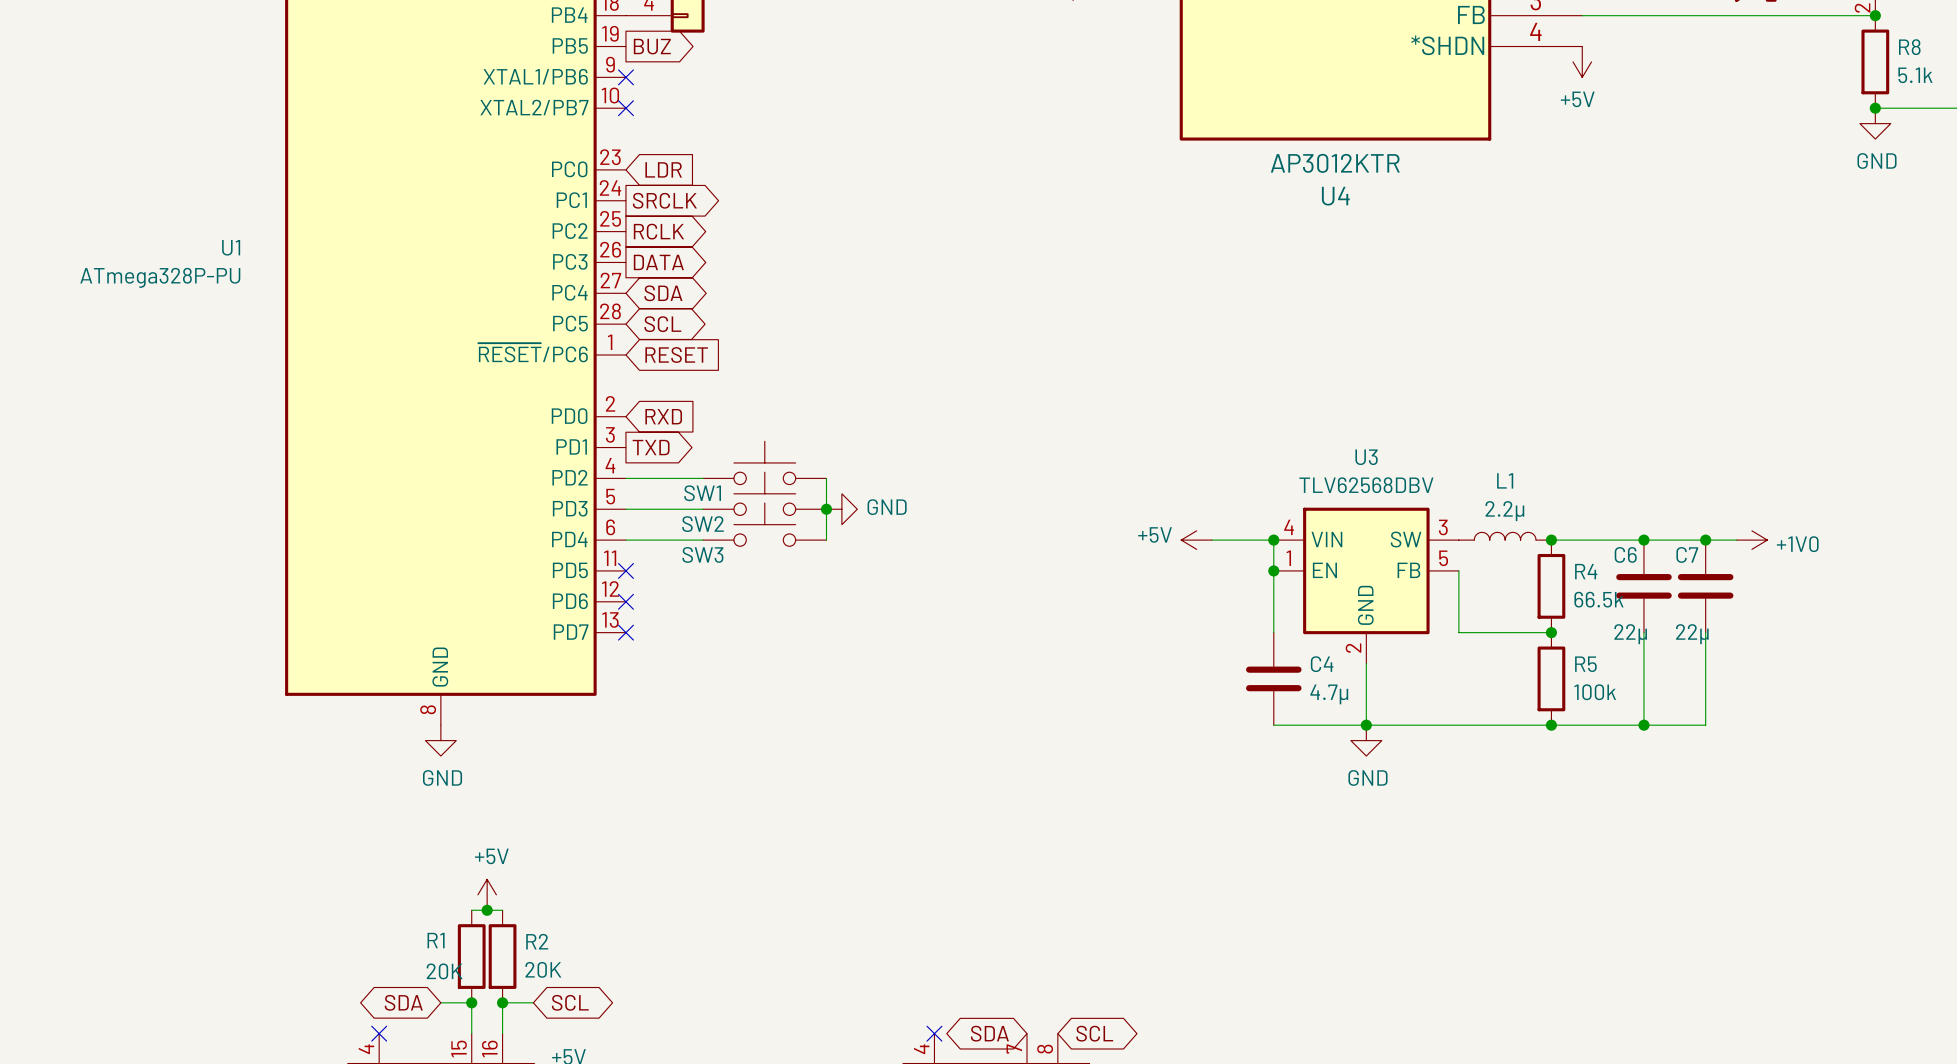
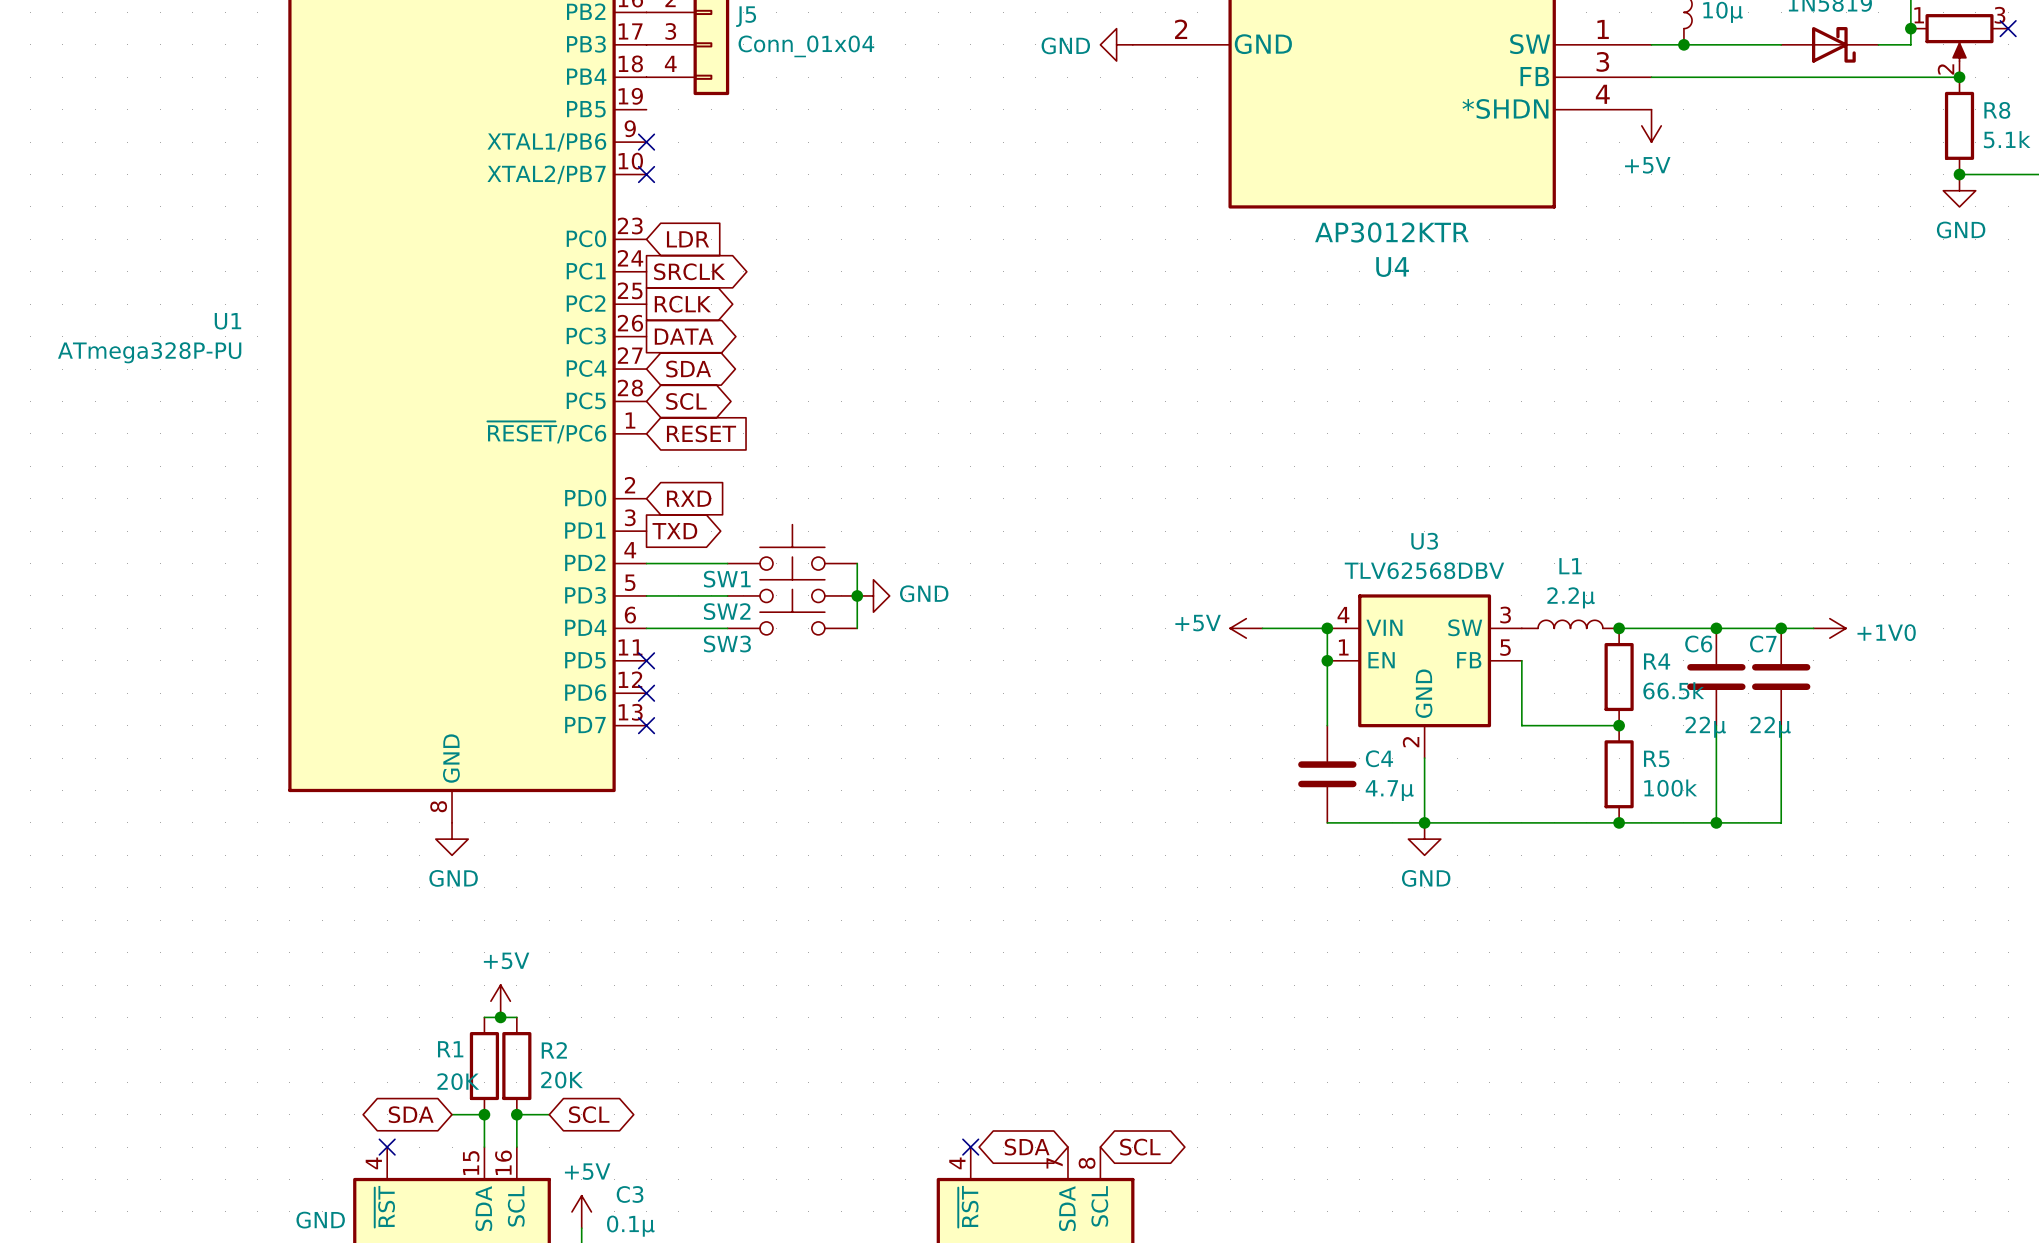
global label: BUZ (652, 46) -> none

